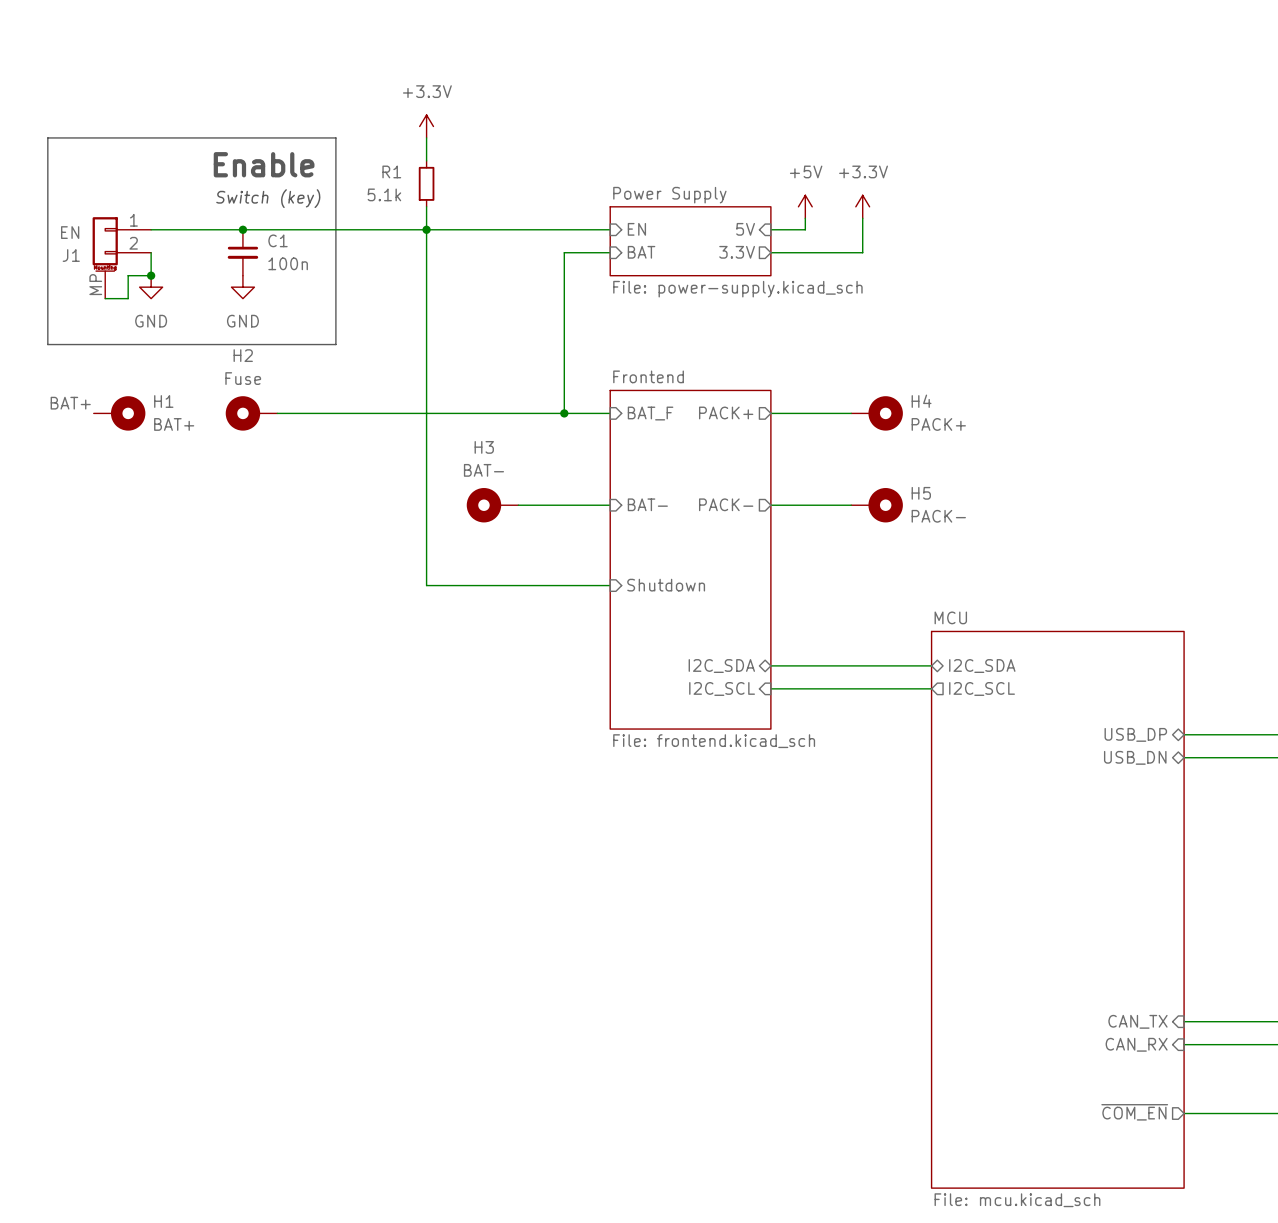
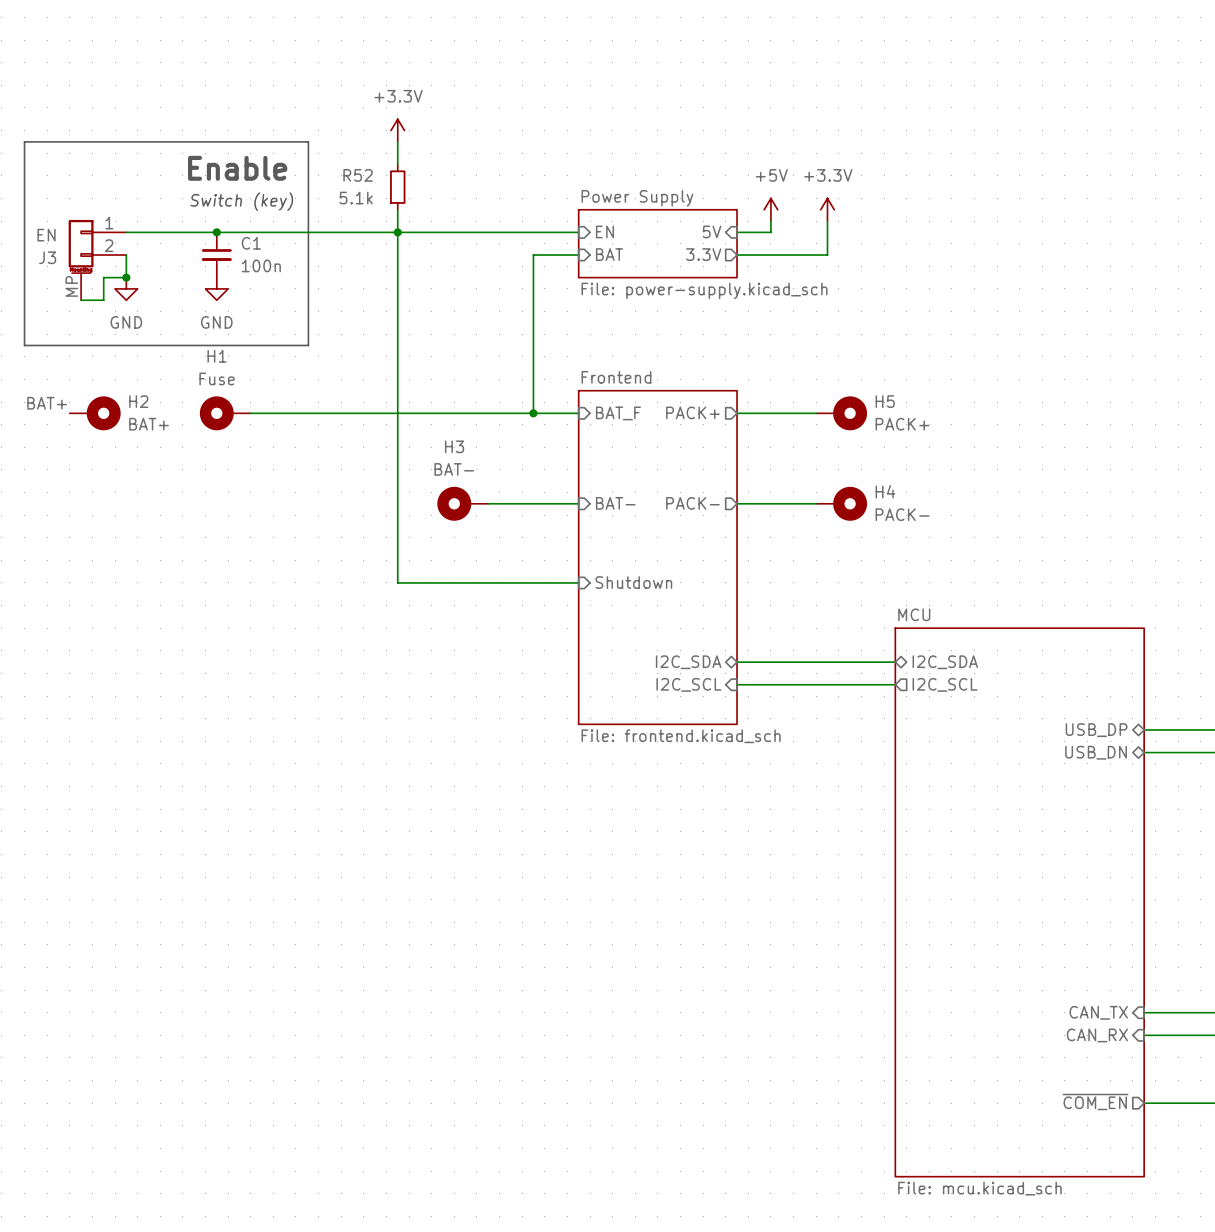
R1 name: R1 (391, 171) -> R52 (358, 175)
J1 name: J1 (71, 255) -> J3 (47, 257)
H2 name: H2 (243, 355) -> H1 (217, 356)
H1 name: H1 (163, 401) -> H2 (138, 401)
H4 name: H4 (921, 401) -> H5 (885, 401)
H5 name: H5 (921, 493) -> H4 (885, 491)

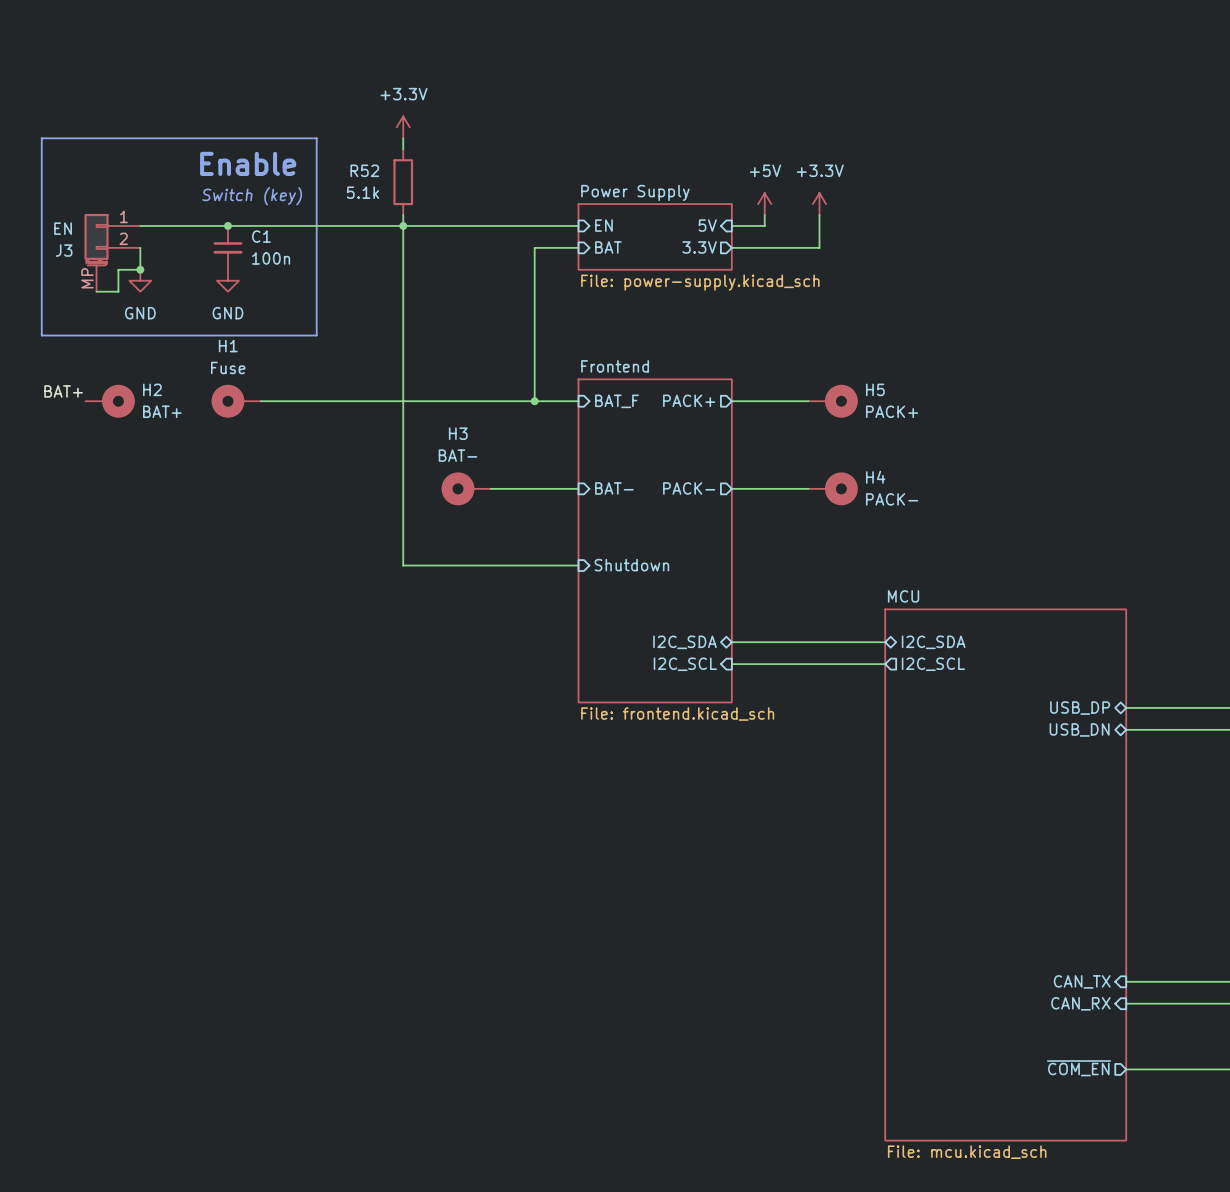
R52 symbol: [390, 164, 406, 210] -> [393, 149, 414, 216]

